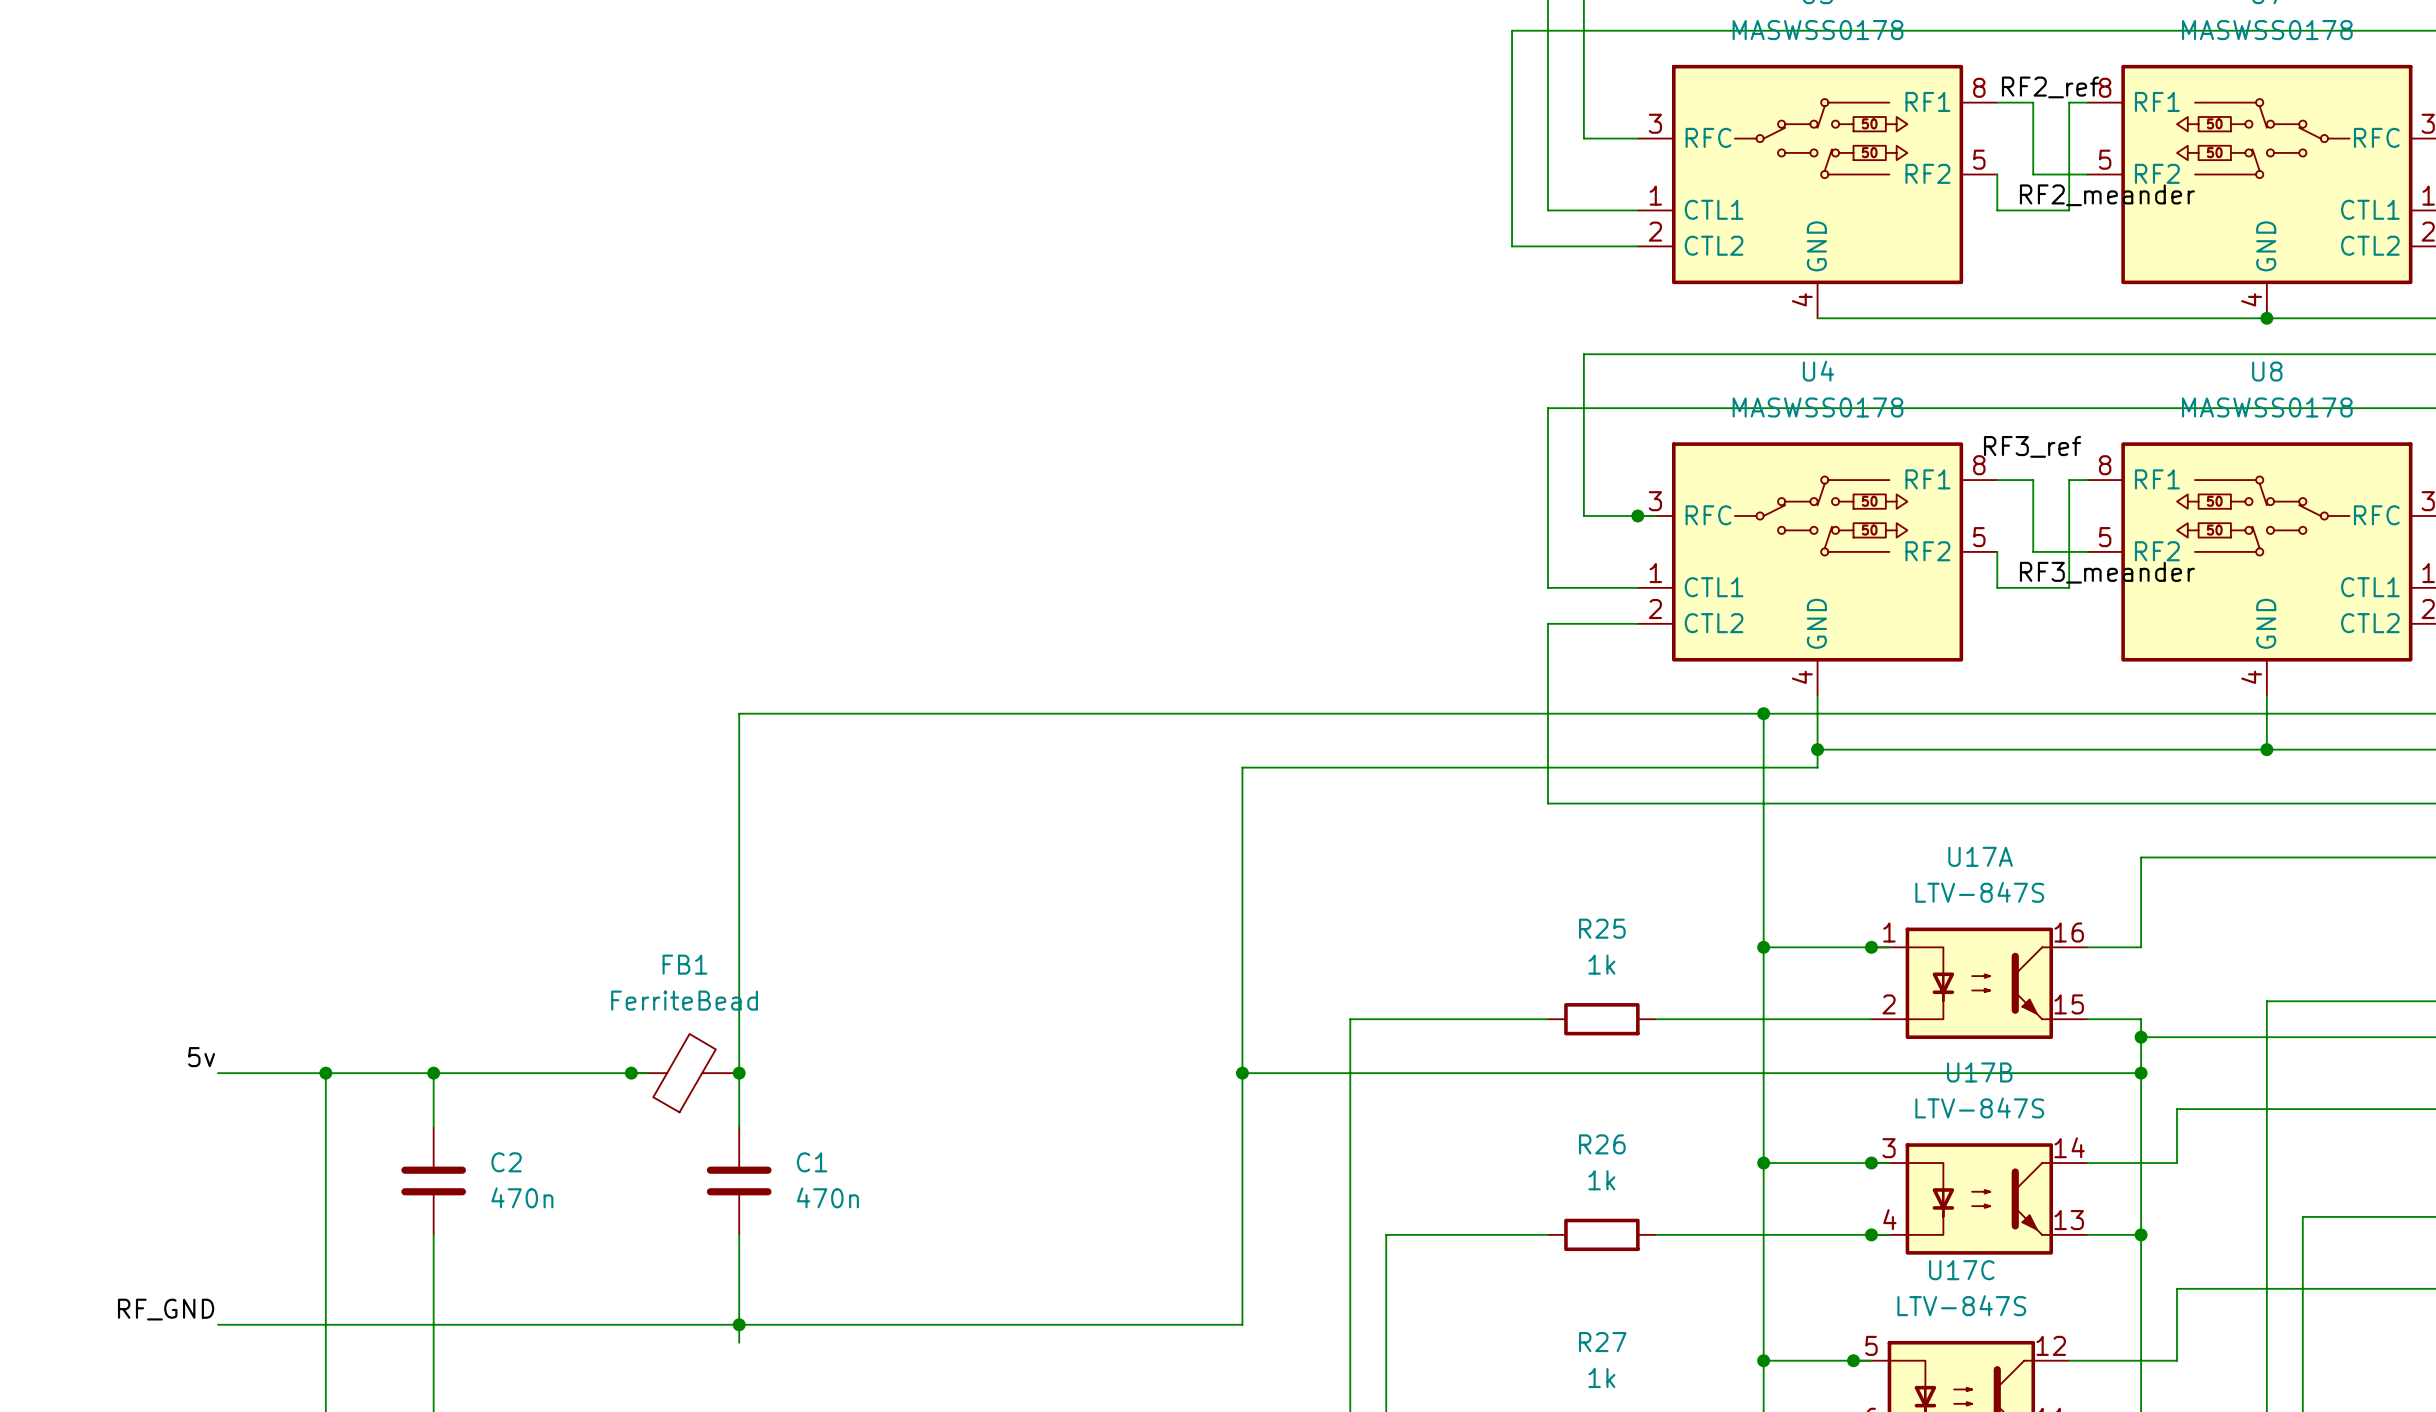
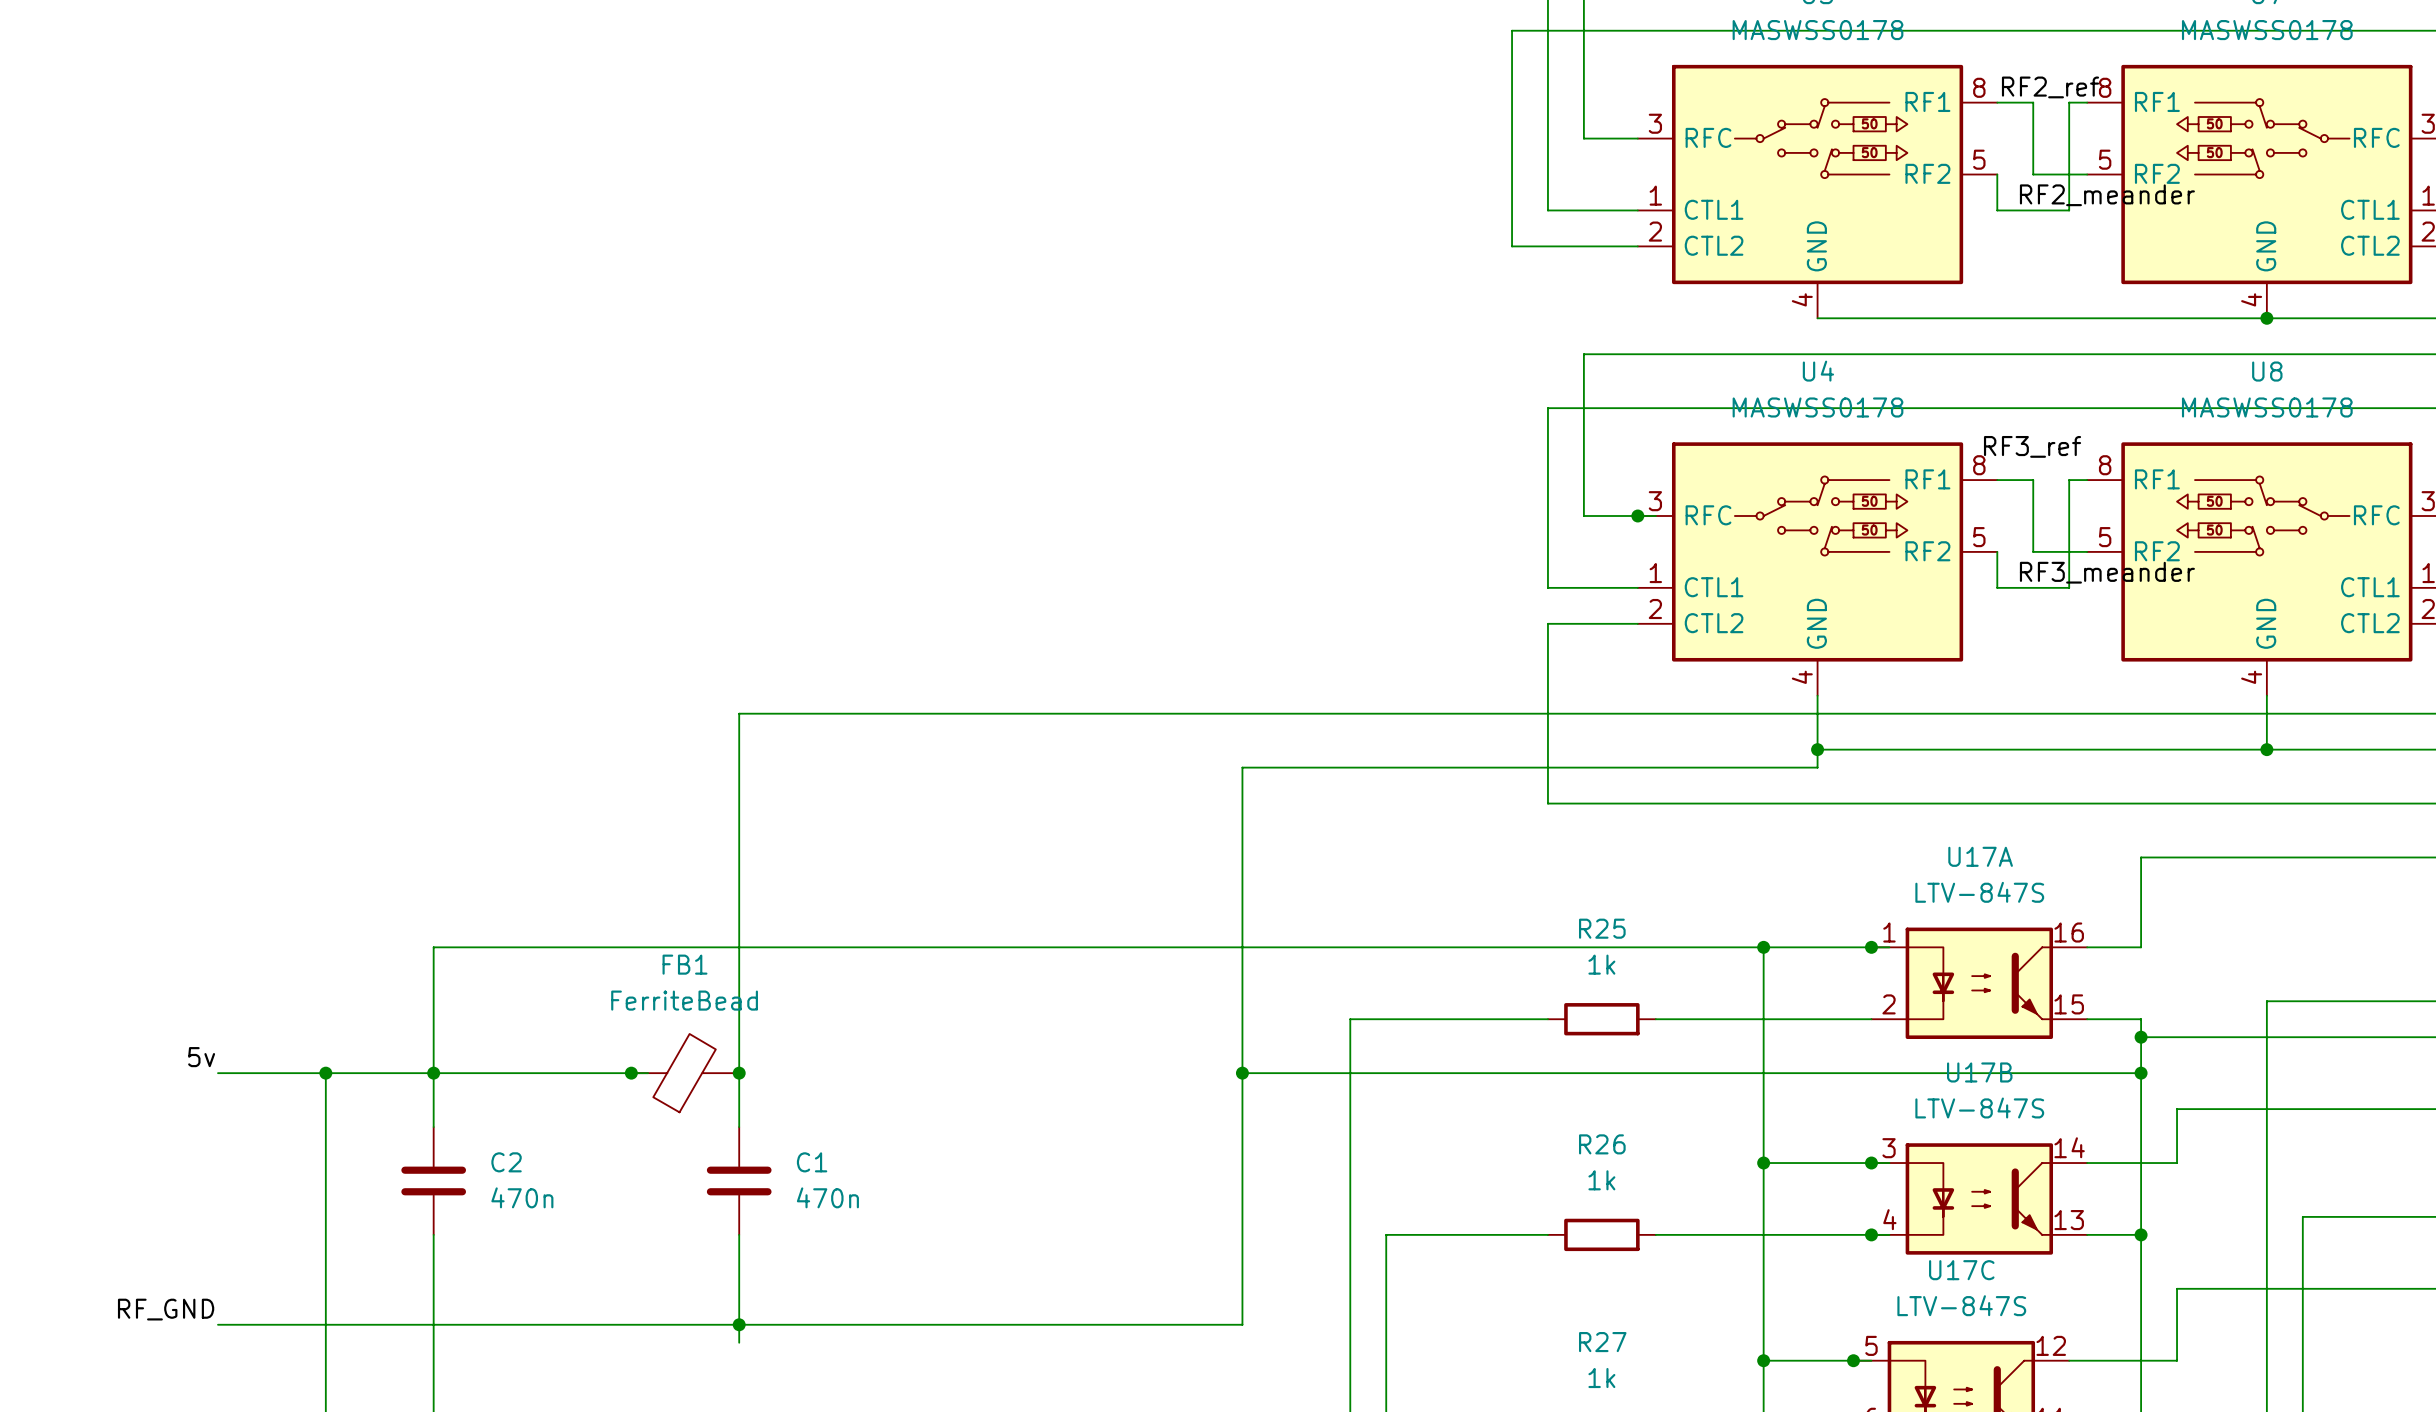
wire: (1763, 713) (1763, 947) -> (433, 1073) (433, 947) (1763, 947)
junction: (1763, 713) -> none

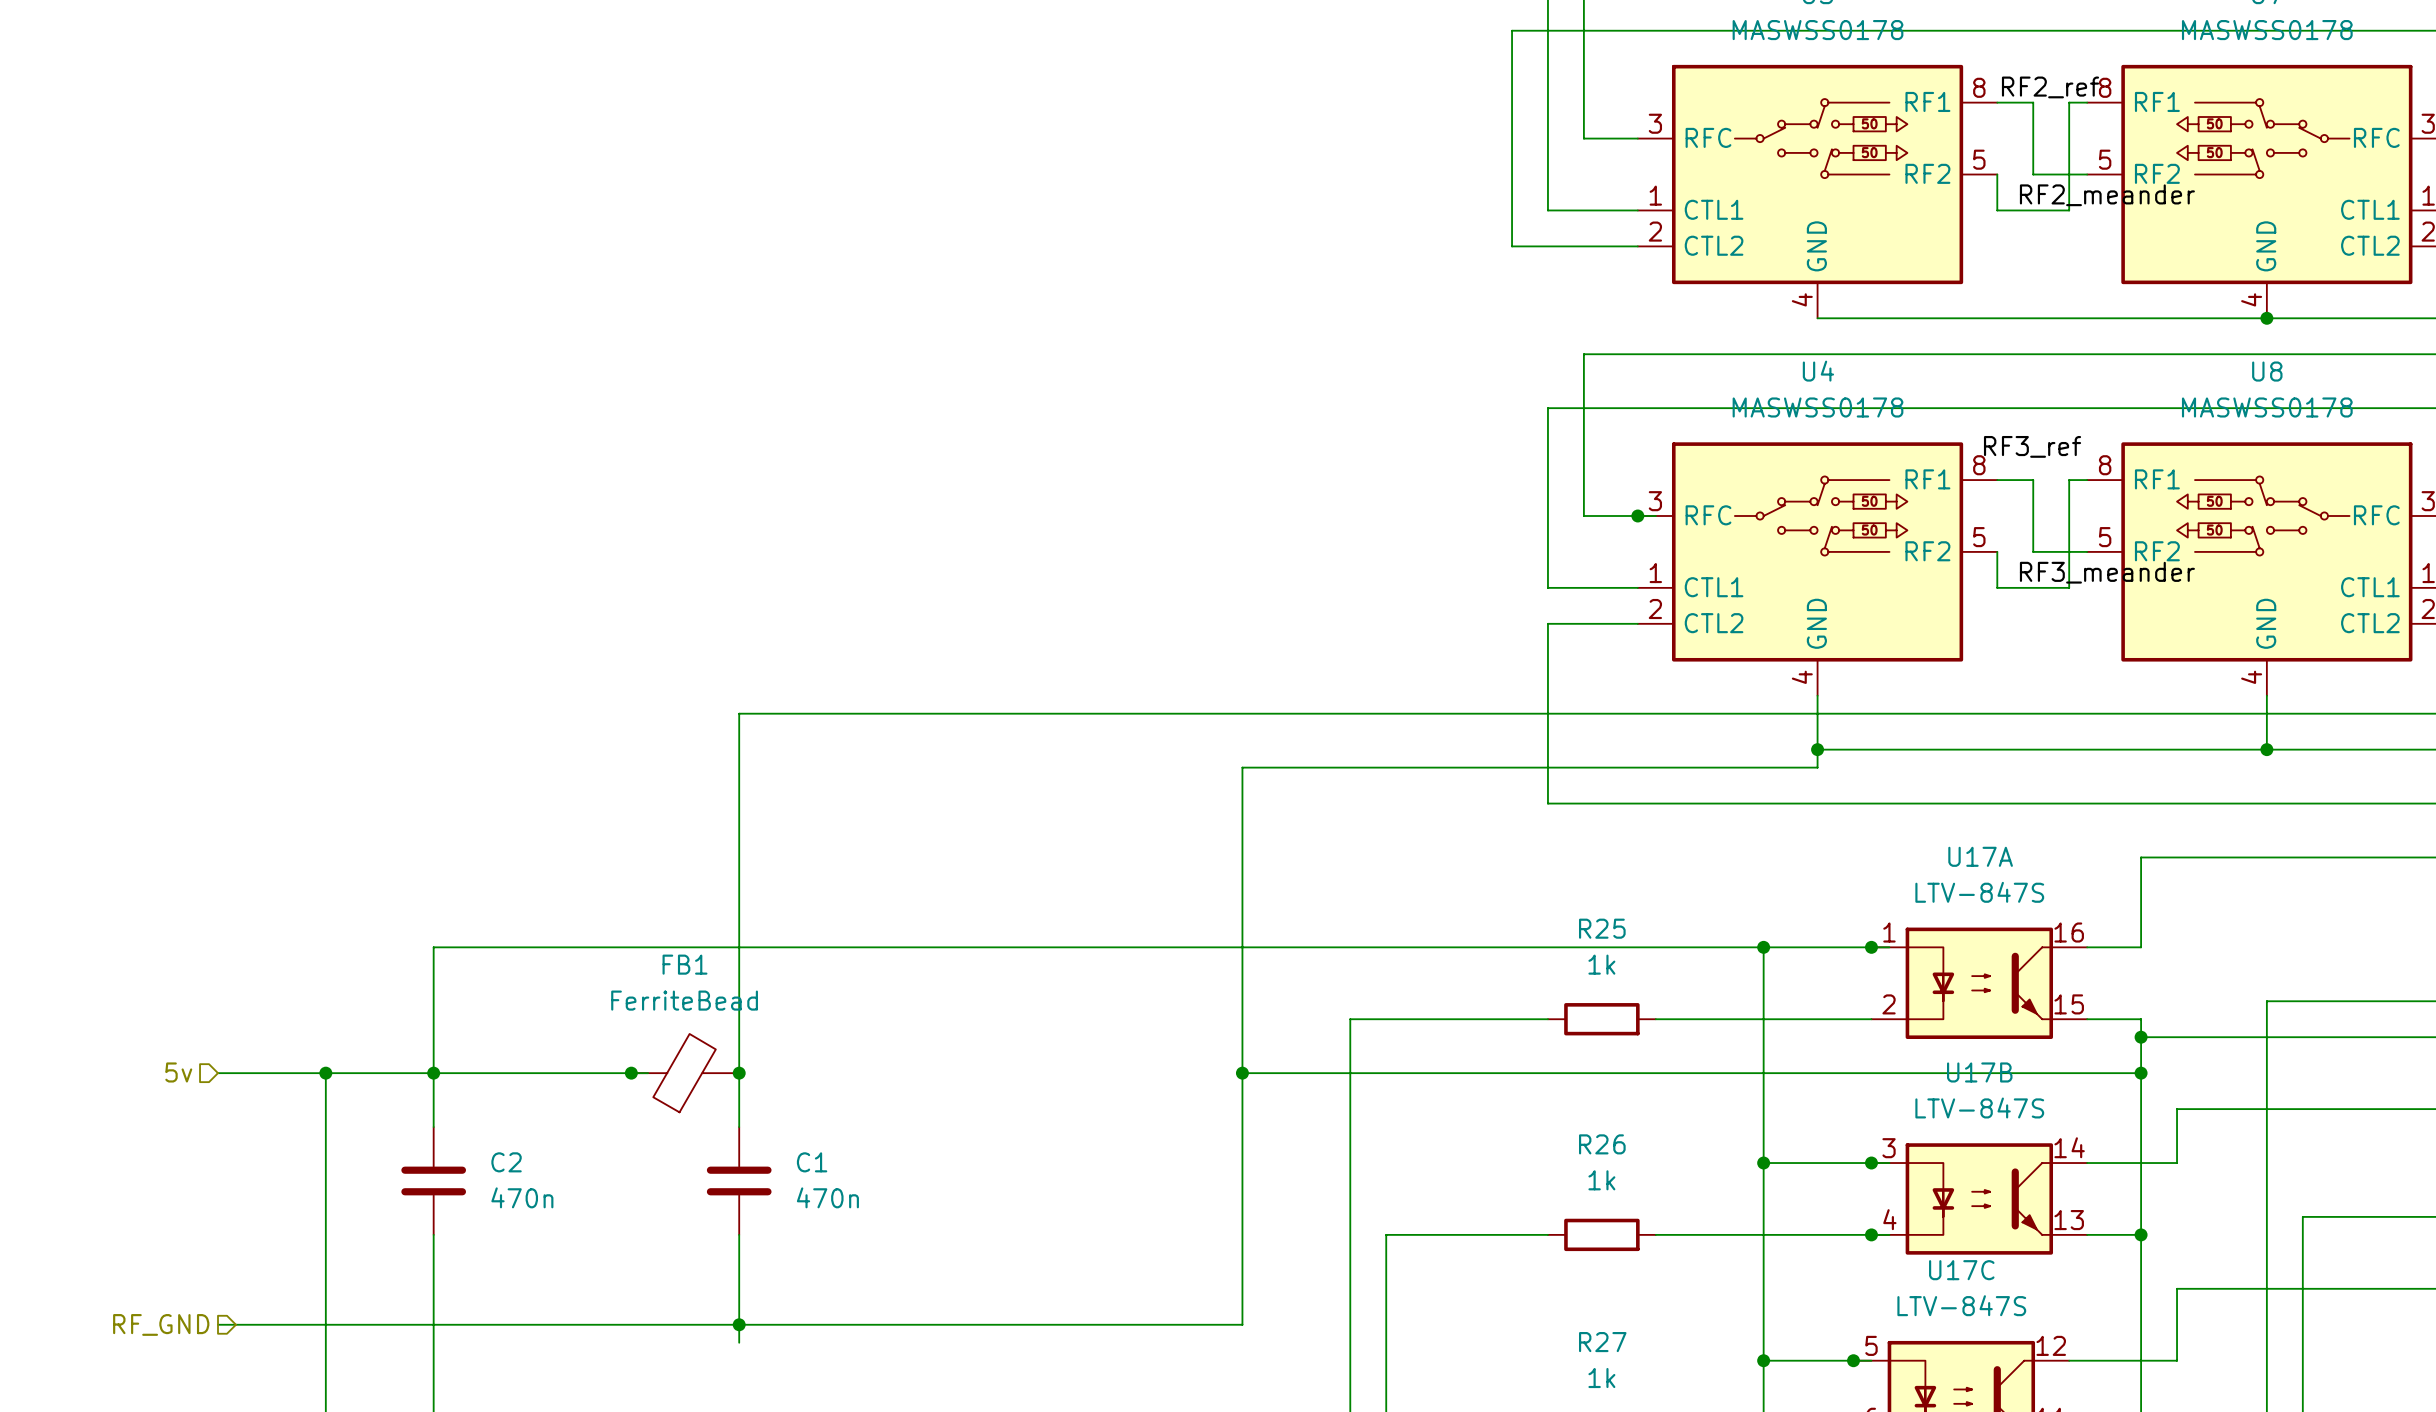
label: 5v (201, 1057) -> none
hierarchical label: none -> 5v (178, 1072)
label: RF_GND (166, 1309) -> none
hierarchical label: none -> RF_GND (161, 1324)

